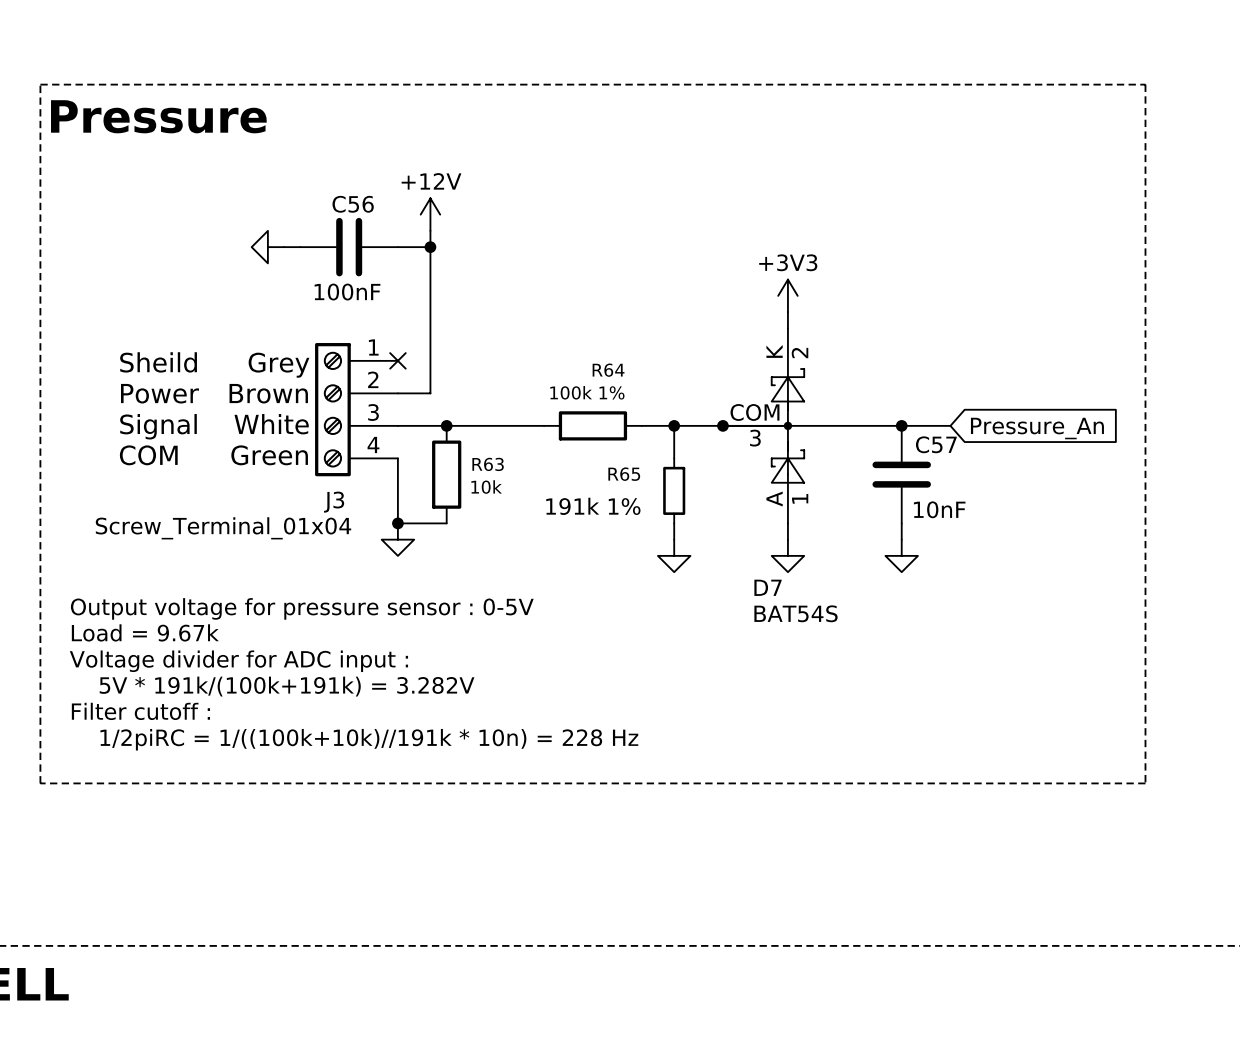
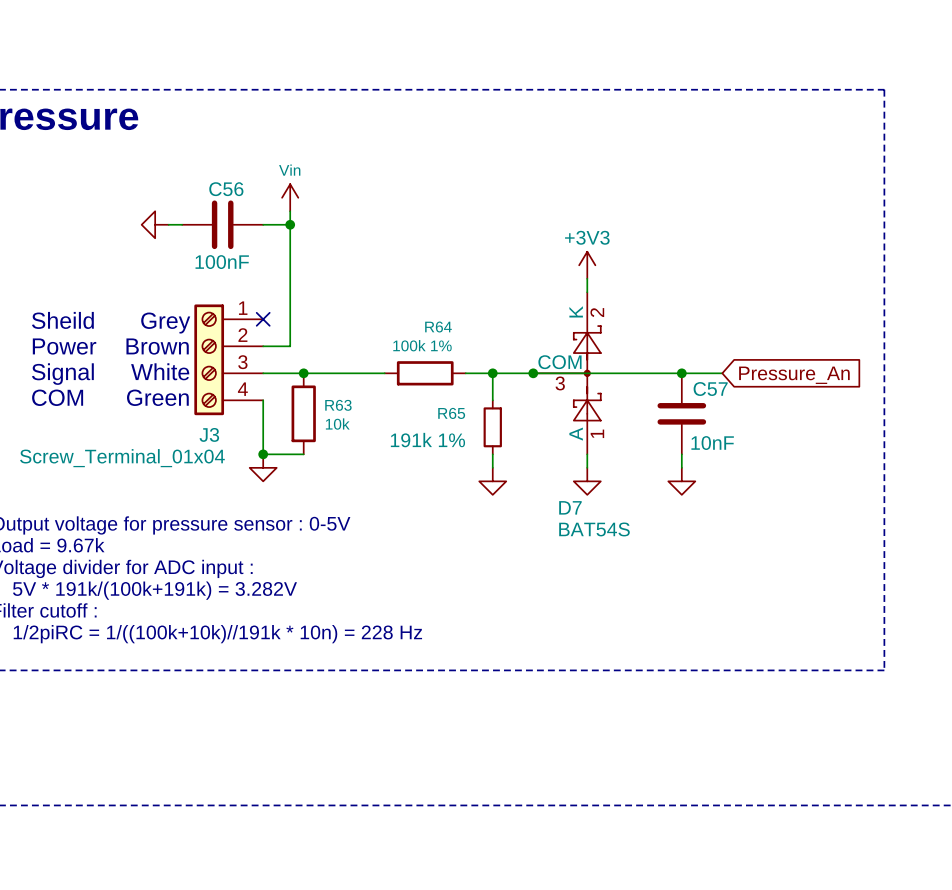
power symbol: +12V (430, 214) -> Vin (290, 197)

